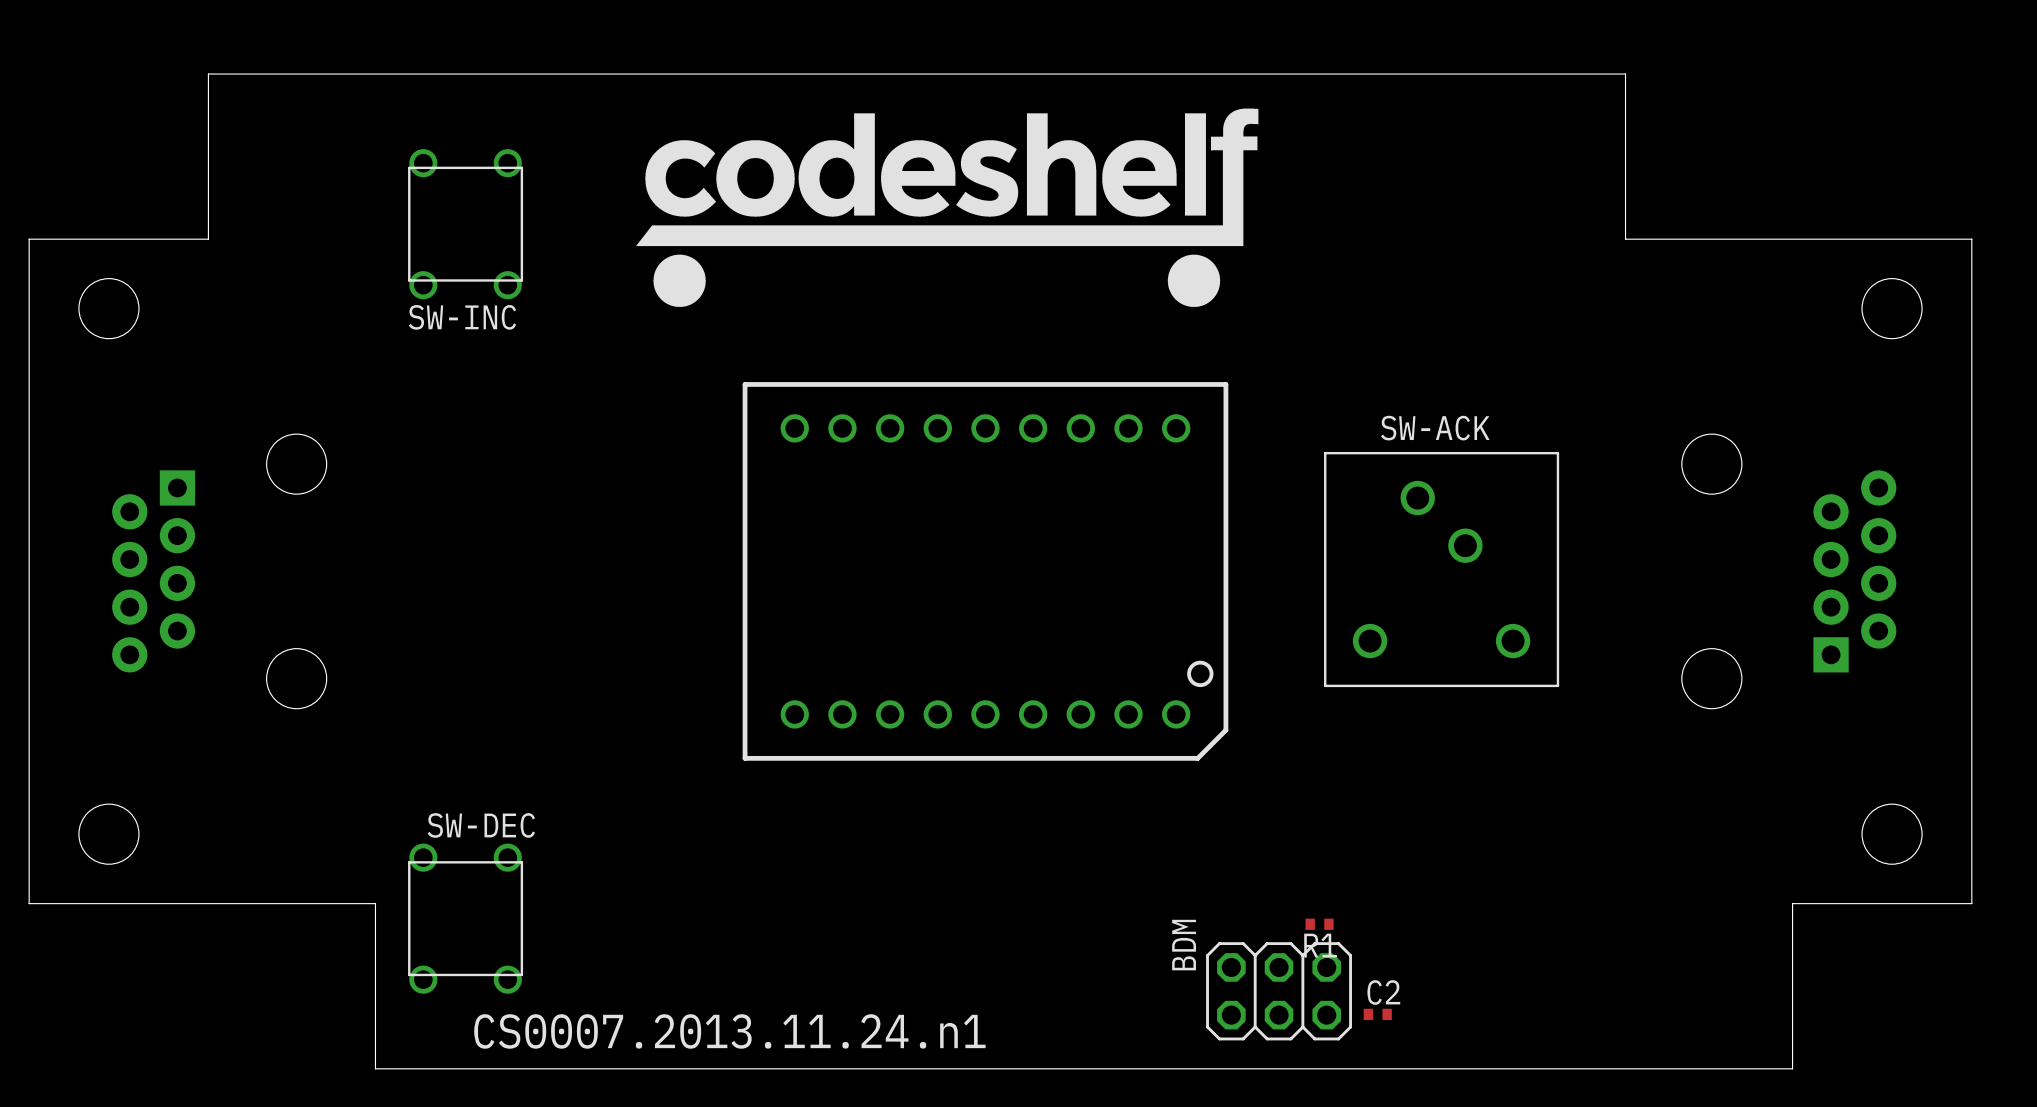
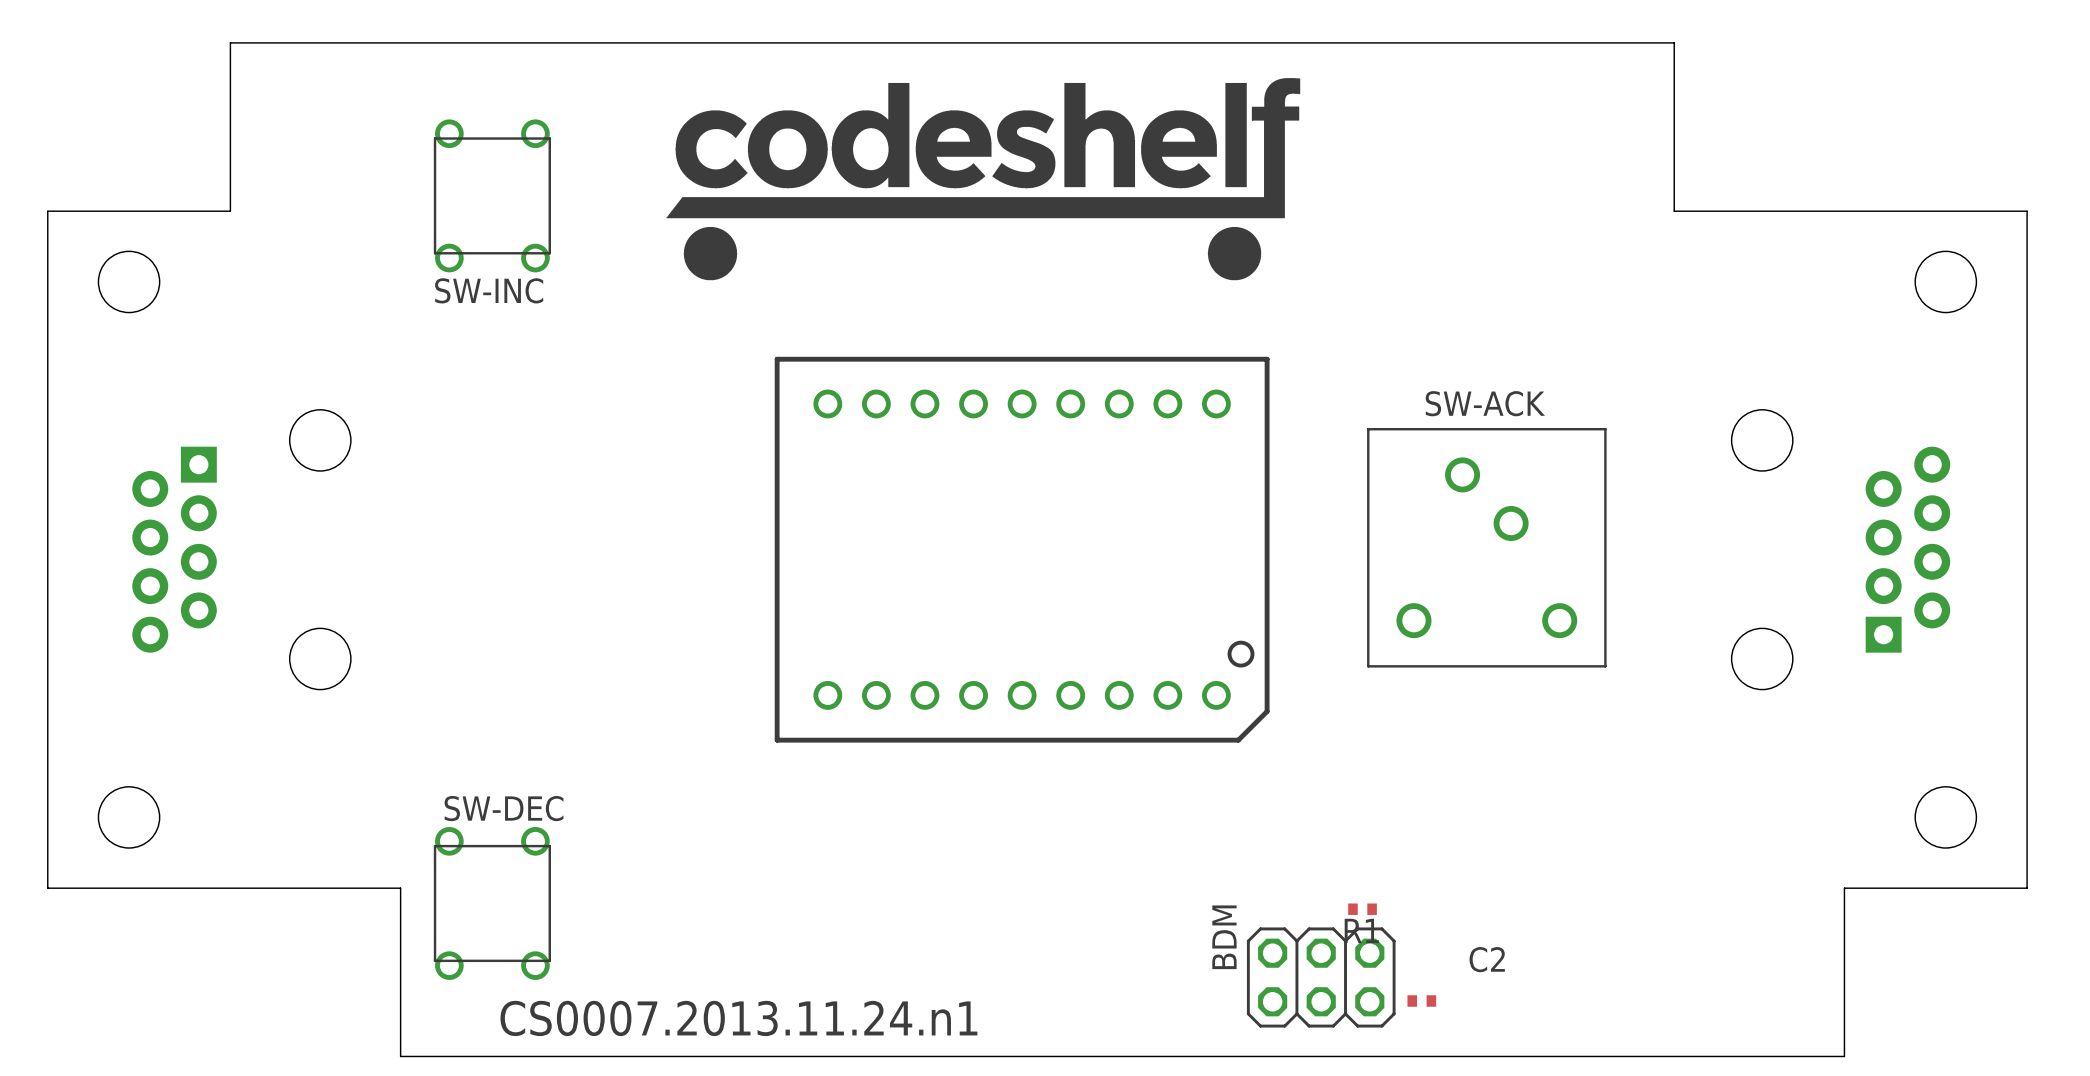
C2 name position: C2 (1383, 992) -> C2 (1487, 959)

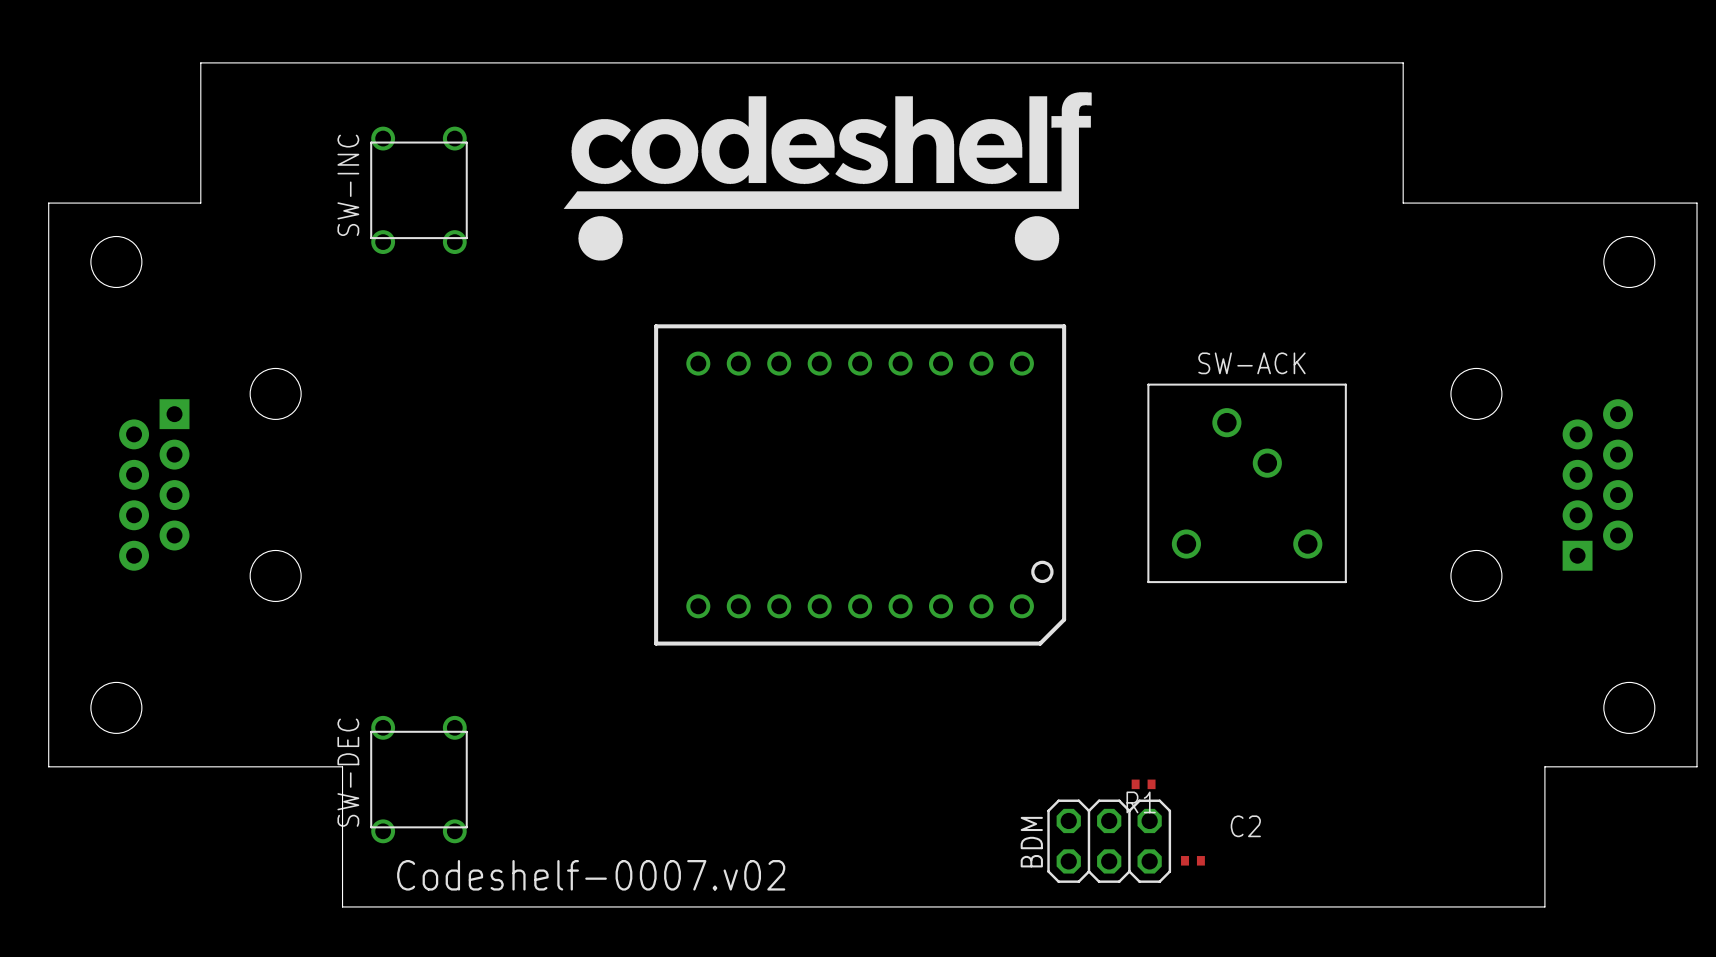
SW-INC name rotation: 0° (489, 290) -> 90° counterclockwise (348, 185)
SW-DEC name rotation: 0° (504, 808) -> 90° counterclockwise (348, 772)
BDM name position: BDM (1224, 937) -> BDM (1031, 842)
text: none -> Codeshelf-0007.v02 (591, 875)
text: CS0007.2013.11.24.n1 (738, 1018) -> none

